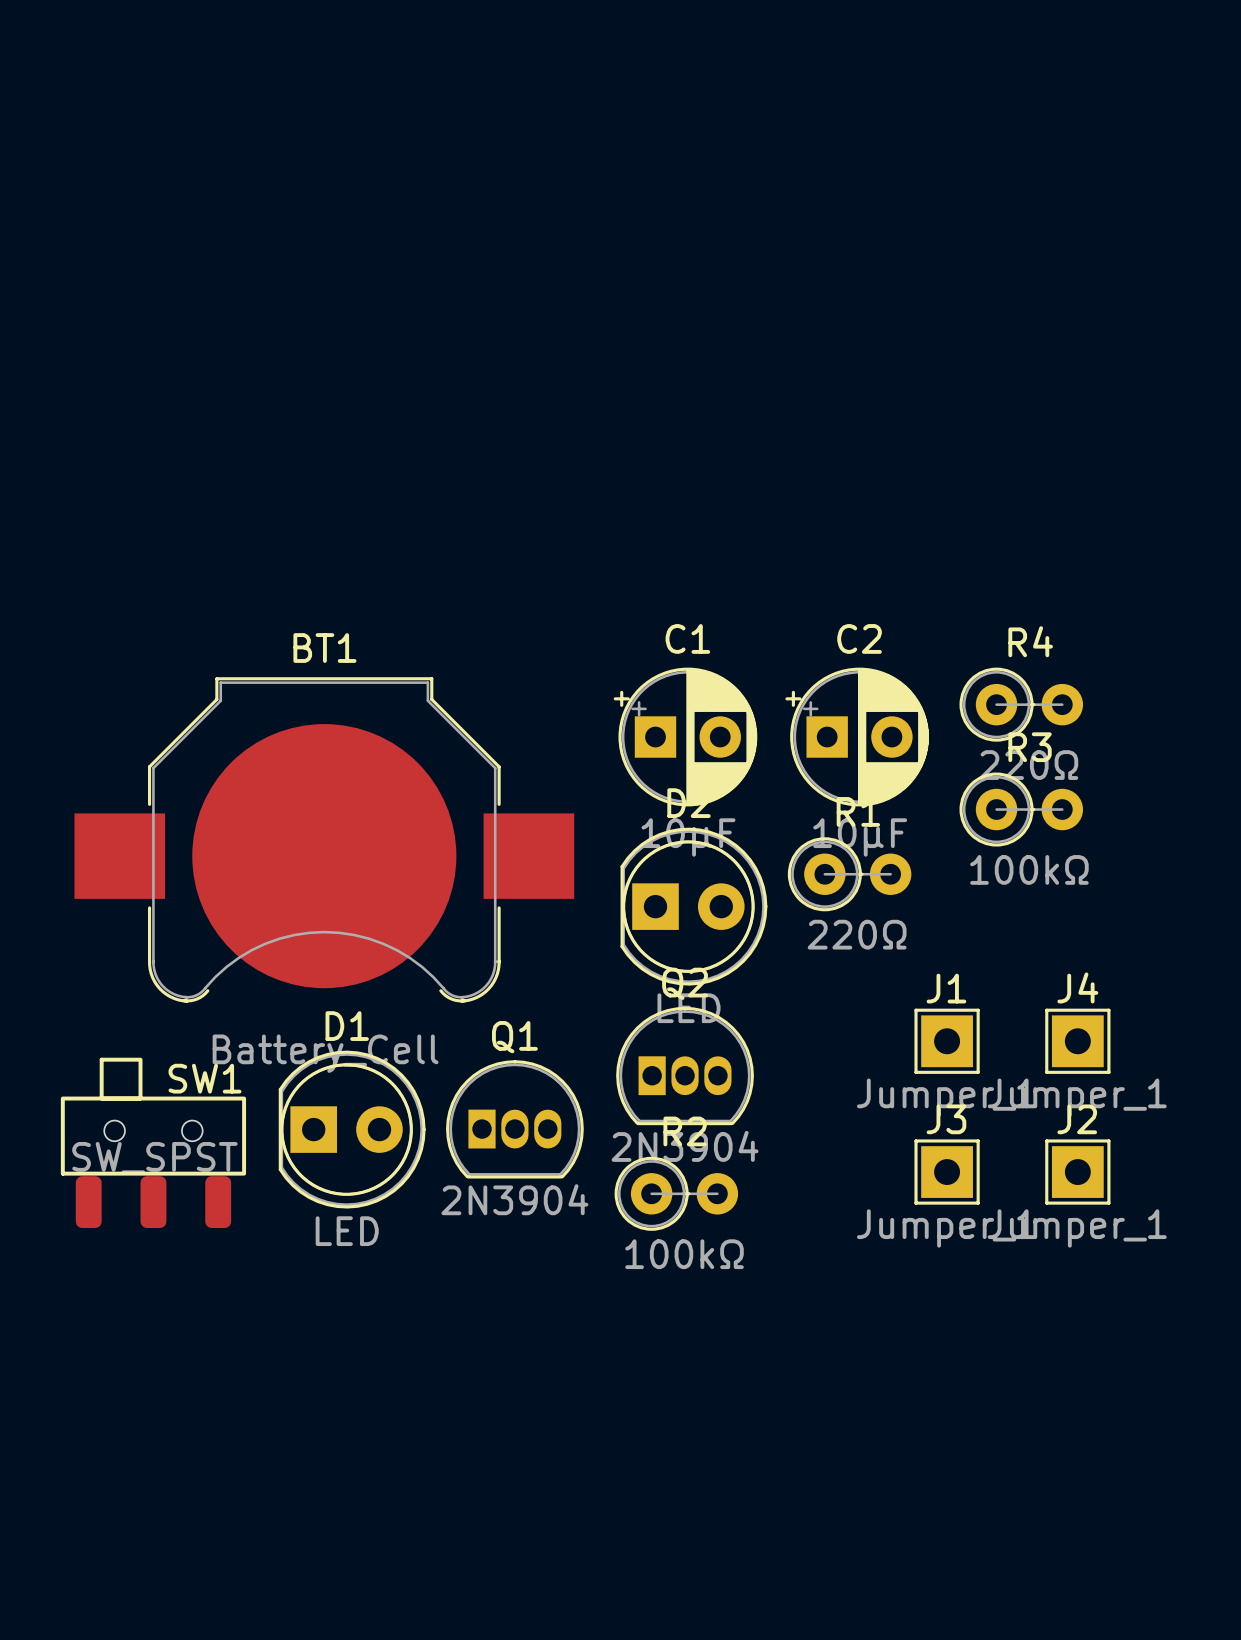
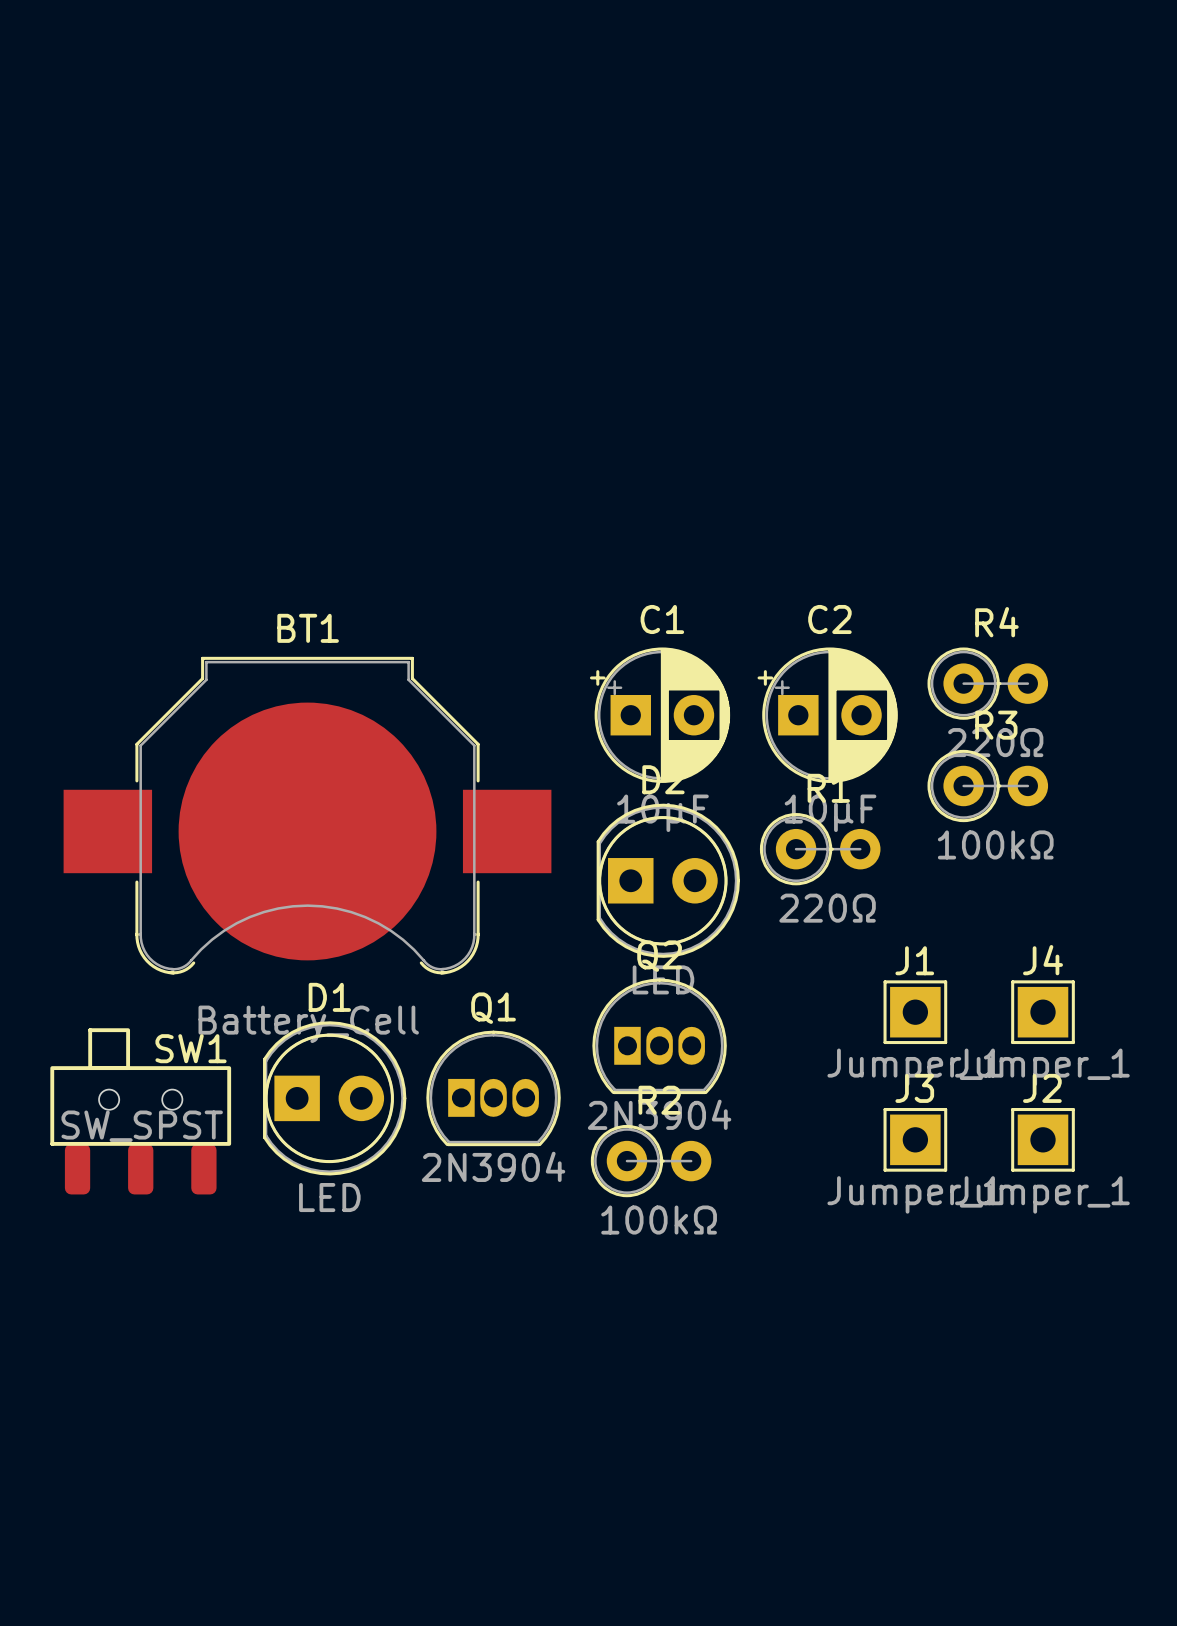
SW1 footprint: [60, 1057, 247, 1229] -> [50, 1028, 232, 1195]

